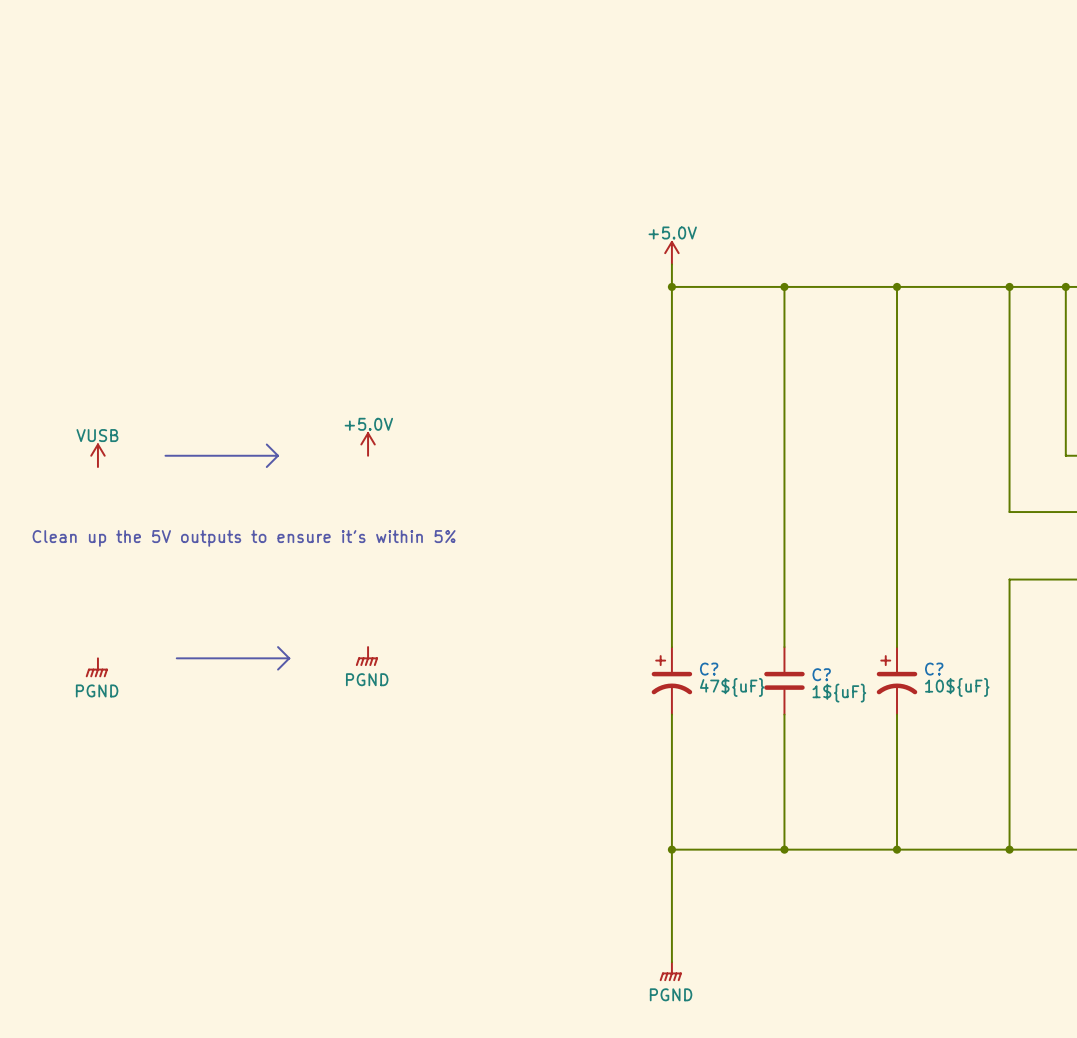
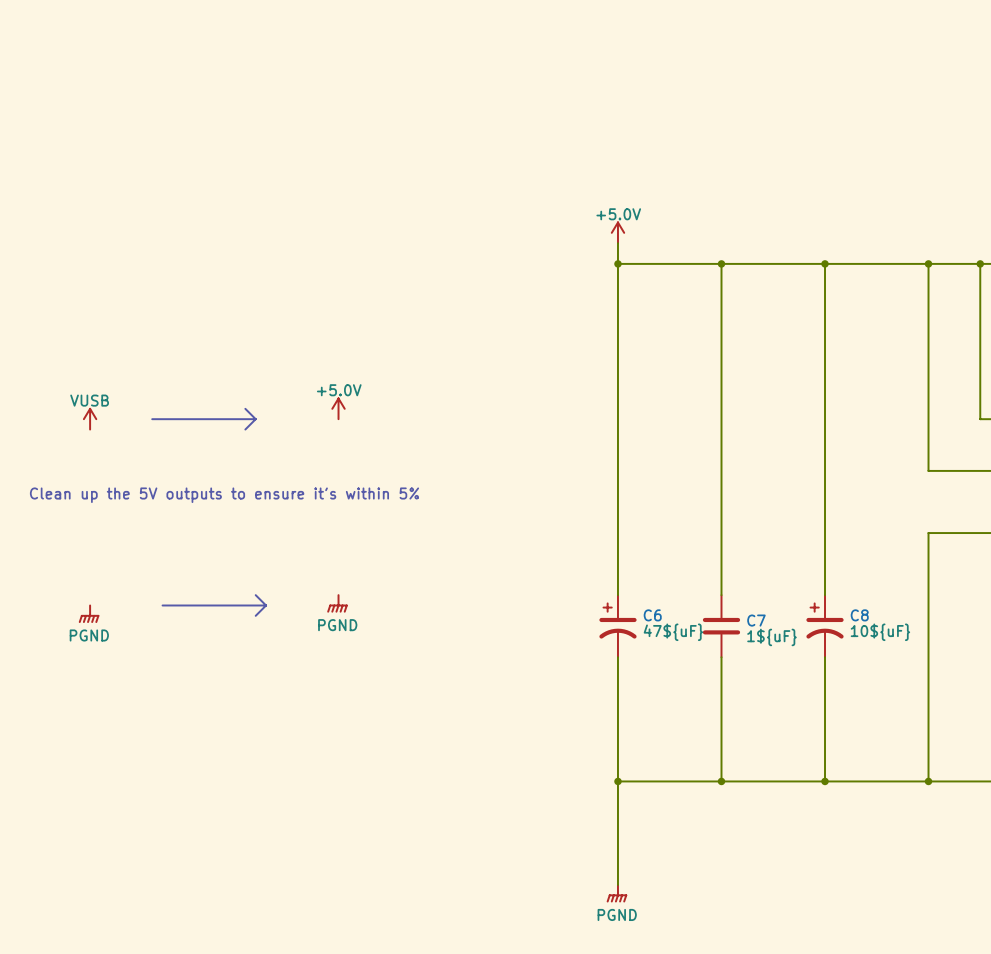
C? name: C? (709, 669) -> C6 (652, 615)
C? name: C? (934, 669) -> C8 (859, 615)
C? name: C? (821, 674) -> C7 (756, 620)

